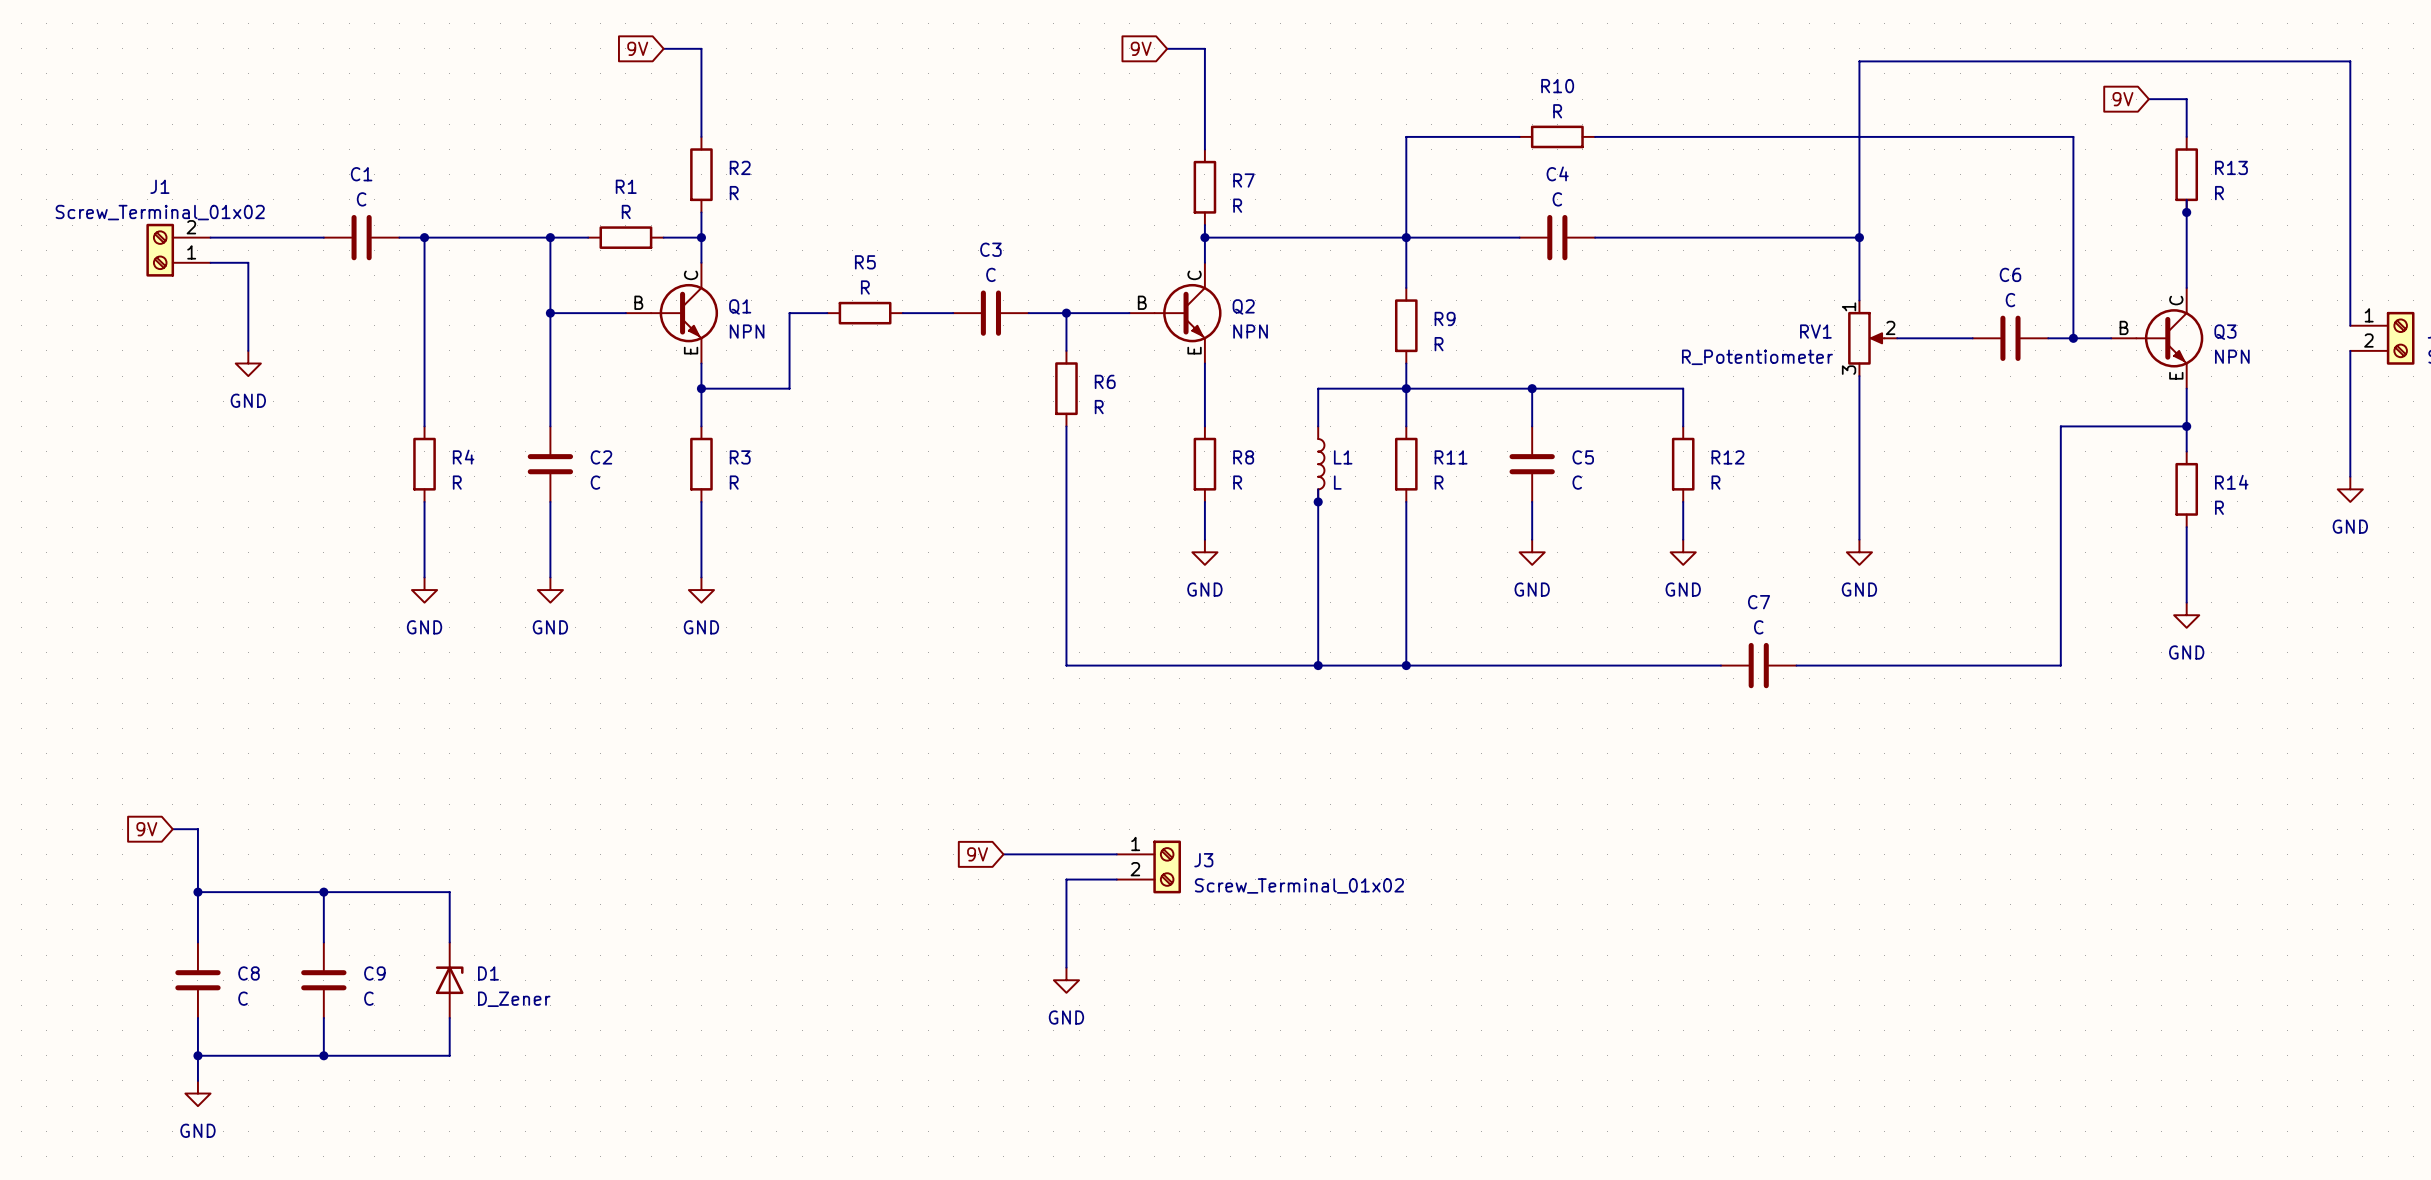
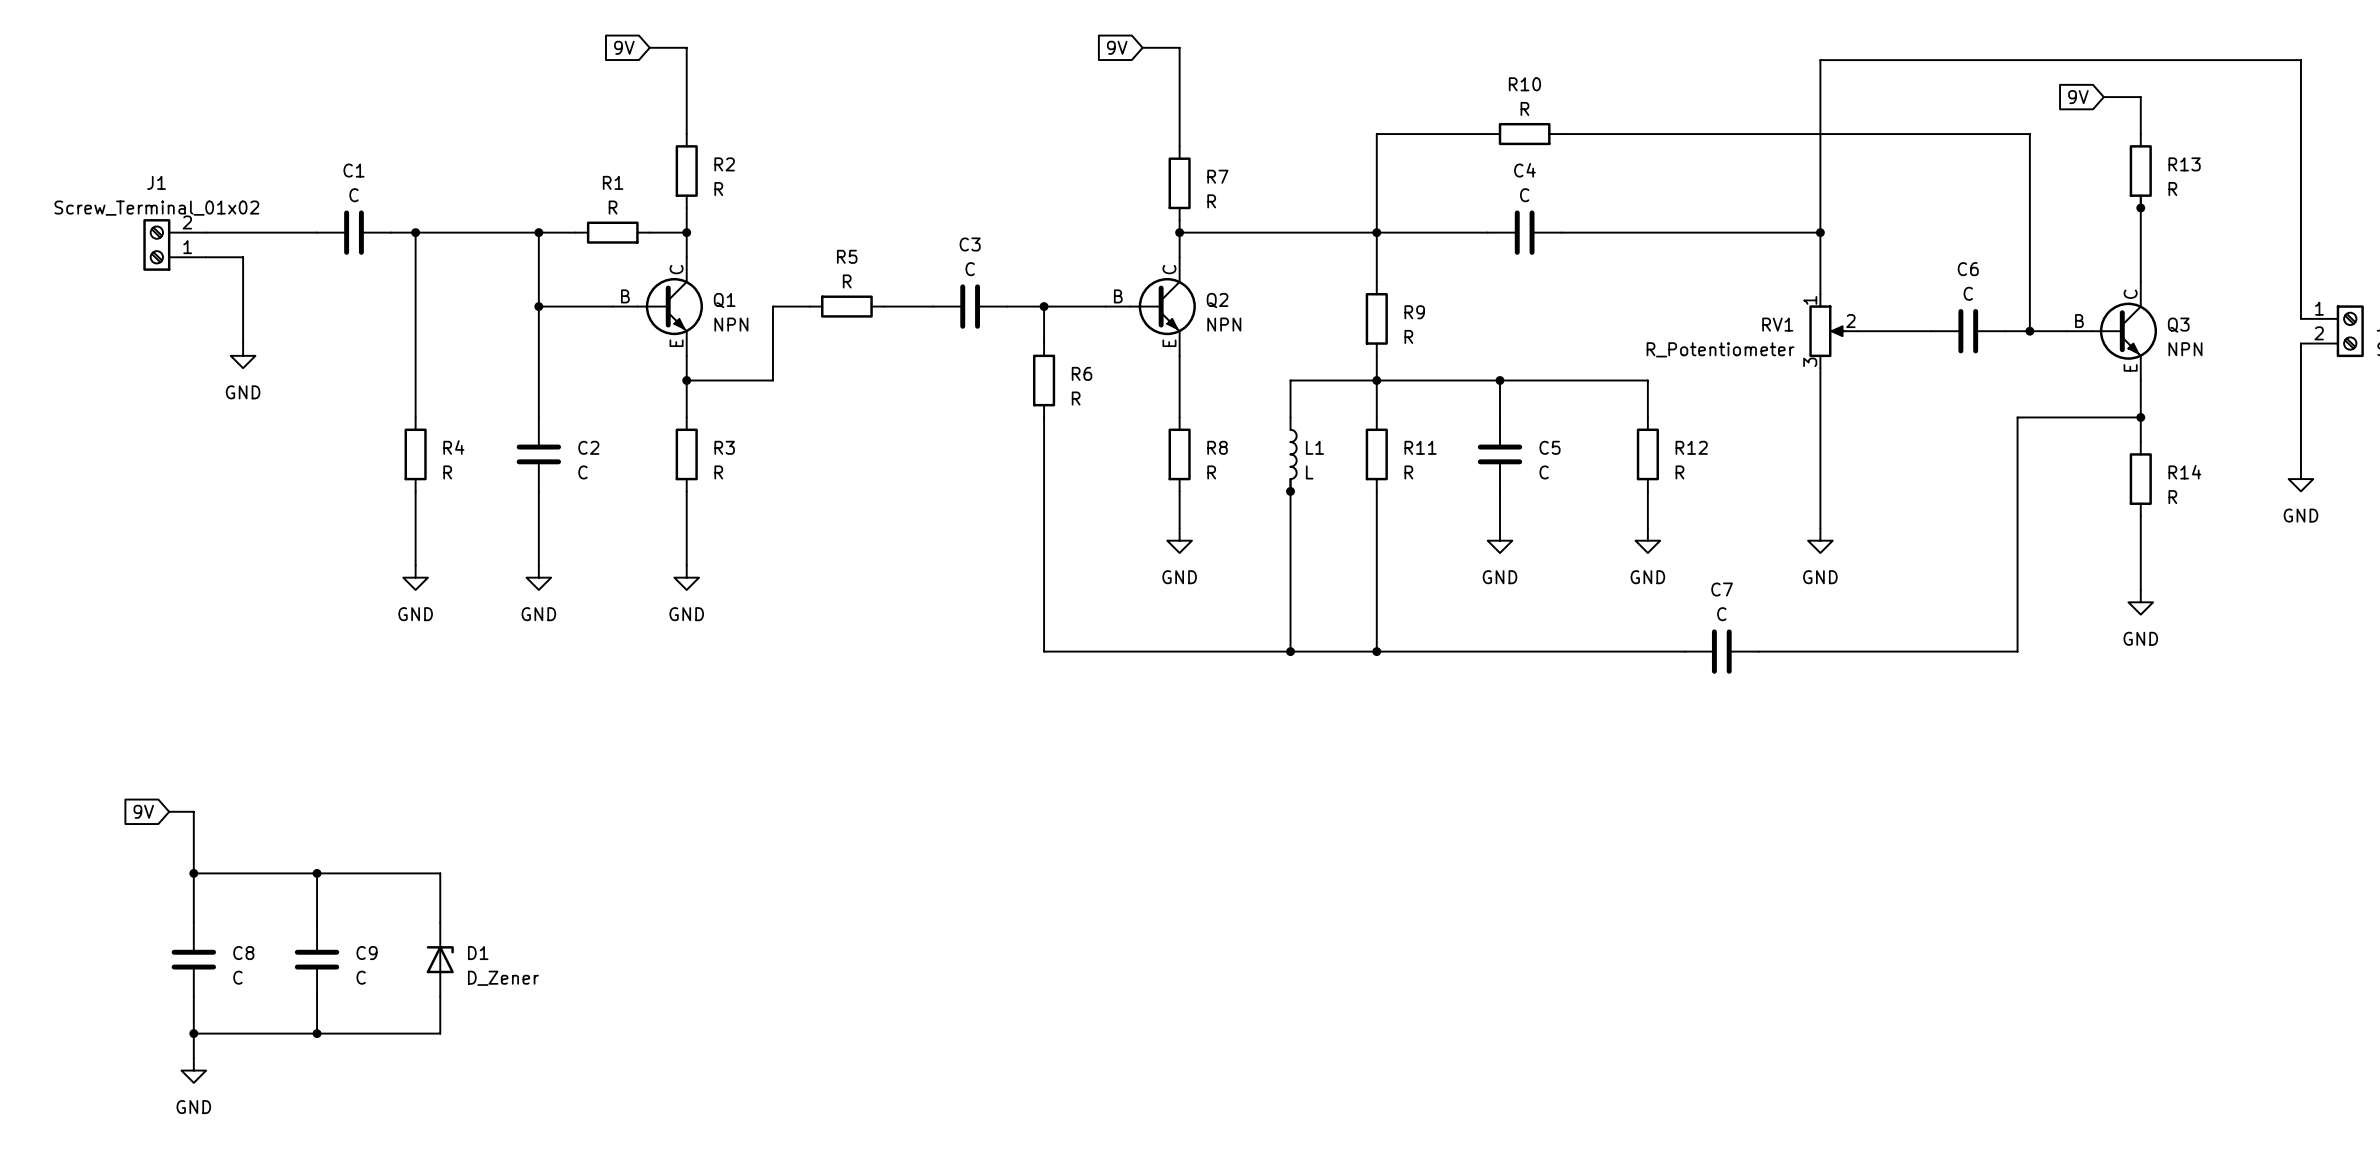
global label: 9V (977, 854) -> none
wire: (1003, 854) (1116, 854) -> none
J3: Screw_Terminal_01x02 (1148, 866) -> none
wire: (1116, 879) (1066, 879) (1066, 967) -> none
power symbol: GND (1066, 980) -> none

